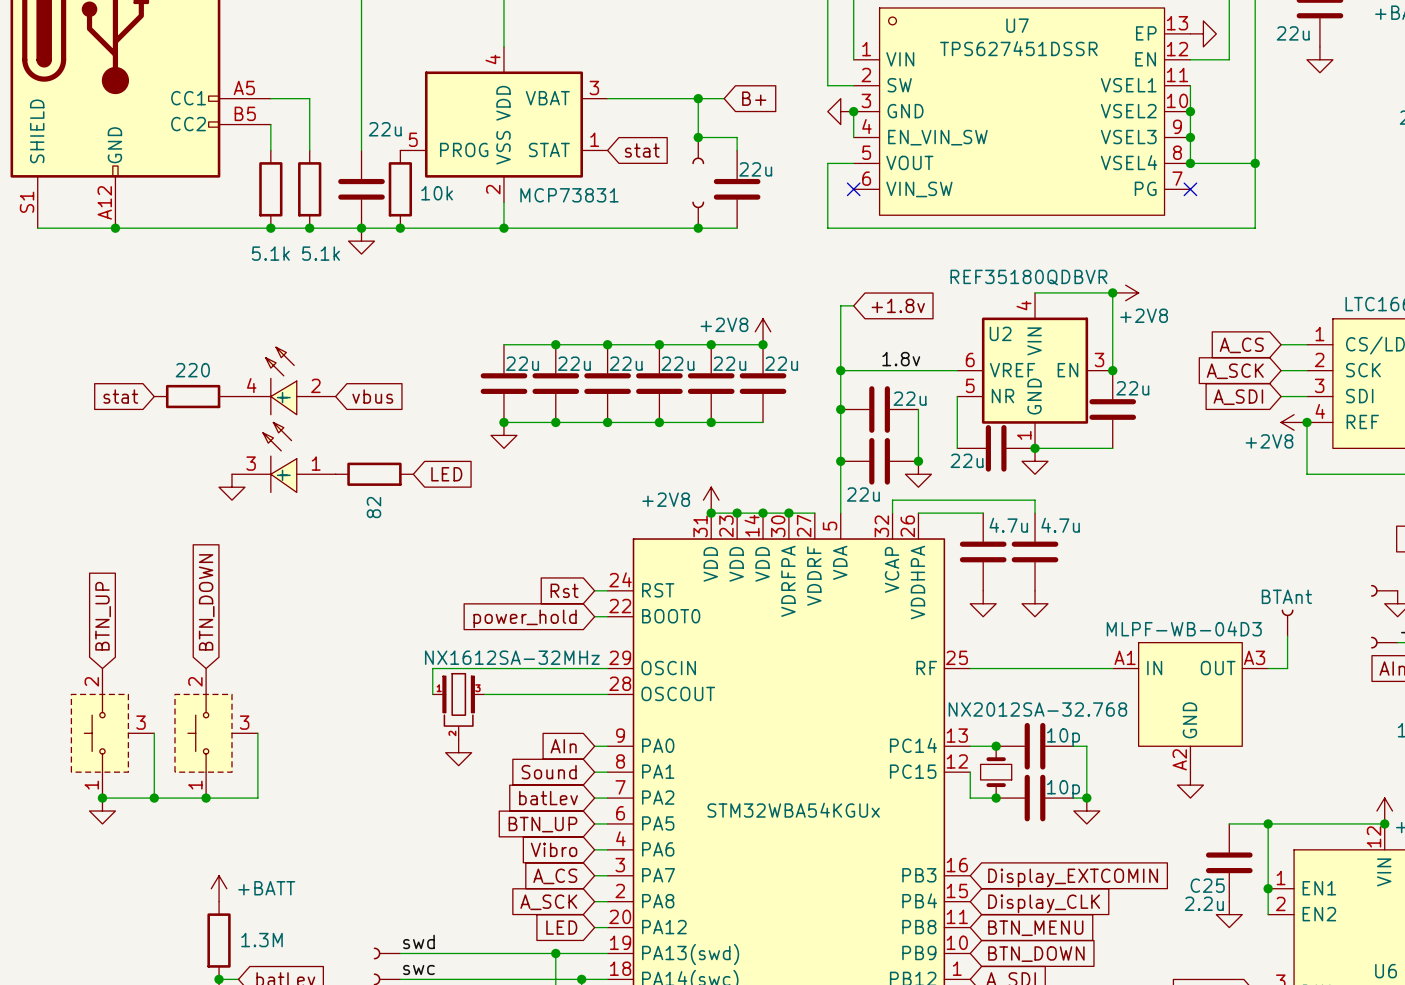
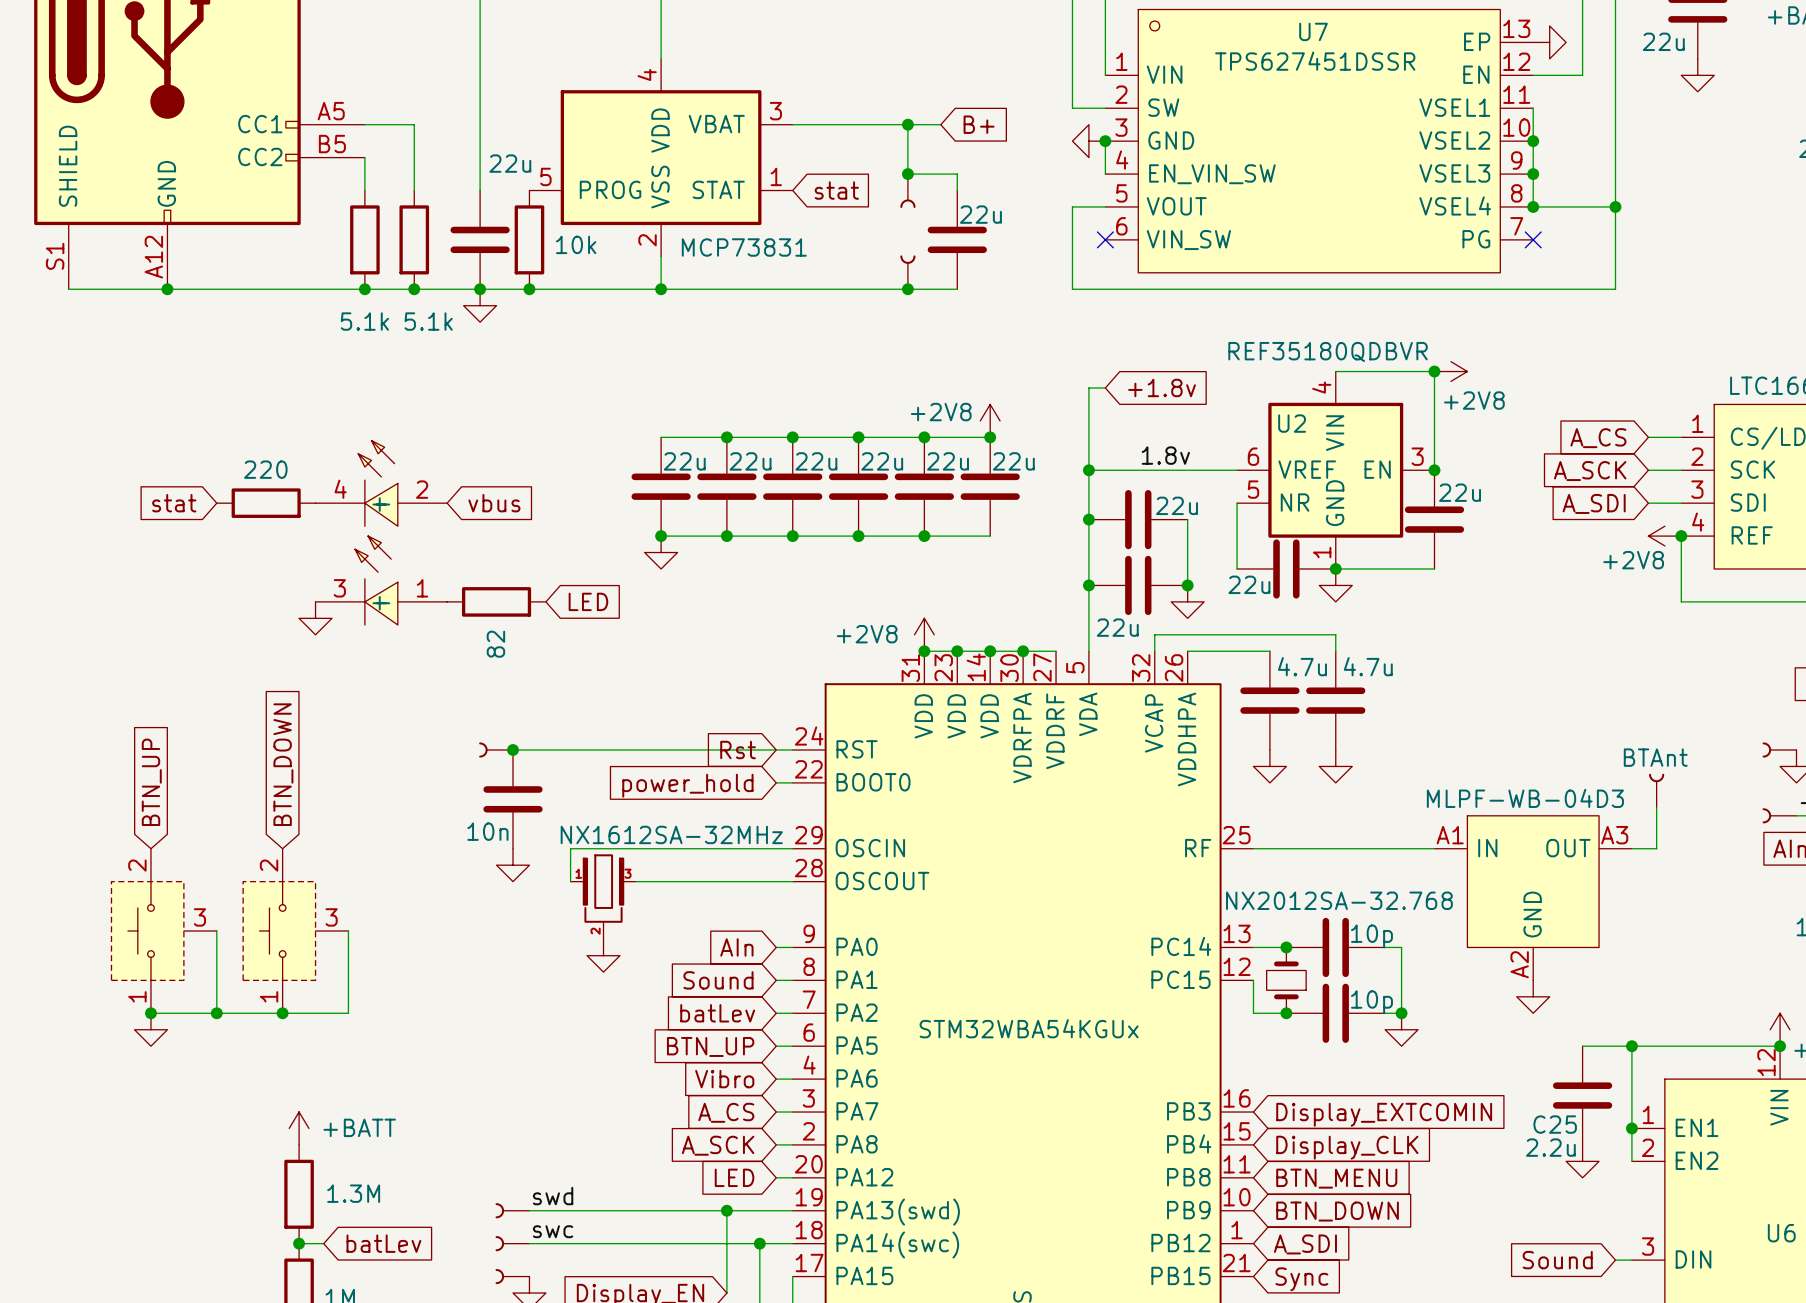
part: none -> (496, 750)
wire: none -> (512, 750) (776, 750)
junction: none -> (512, 750)
part: none -> 10n (512, 799)
power symbol: none -> (512, 865)

